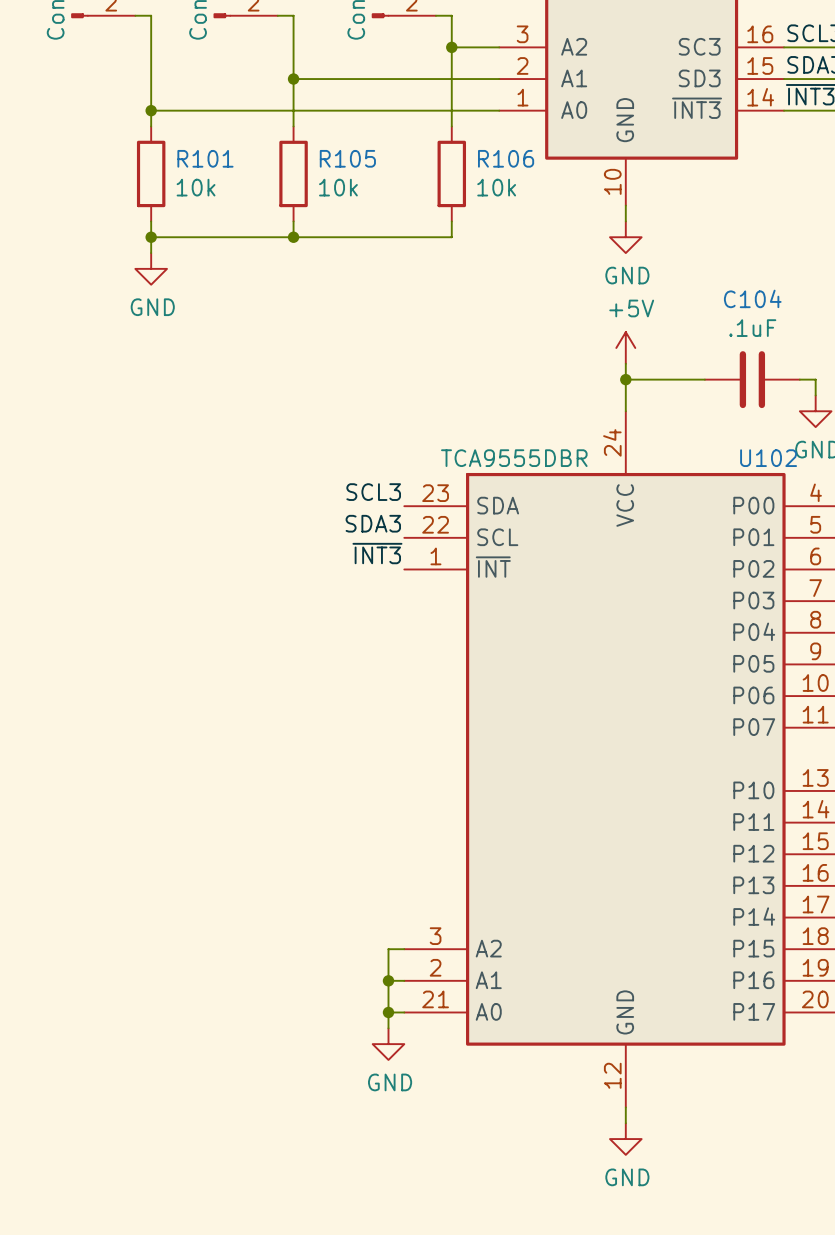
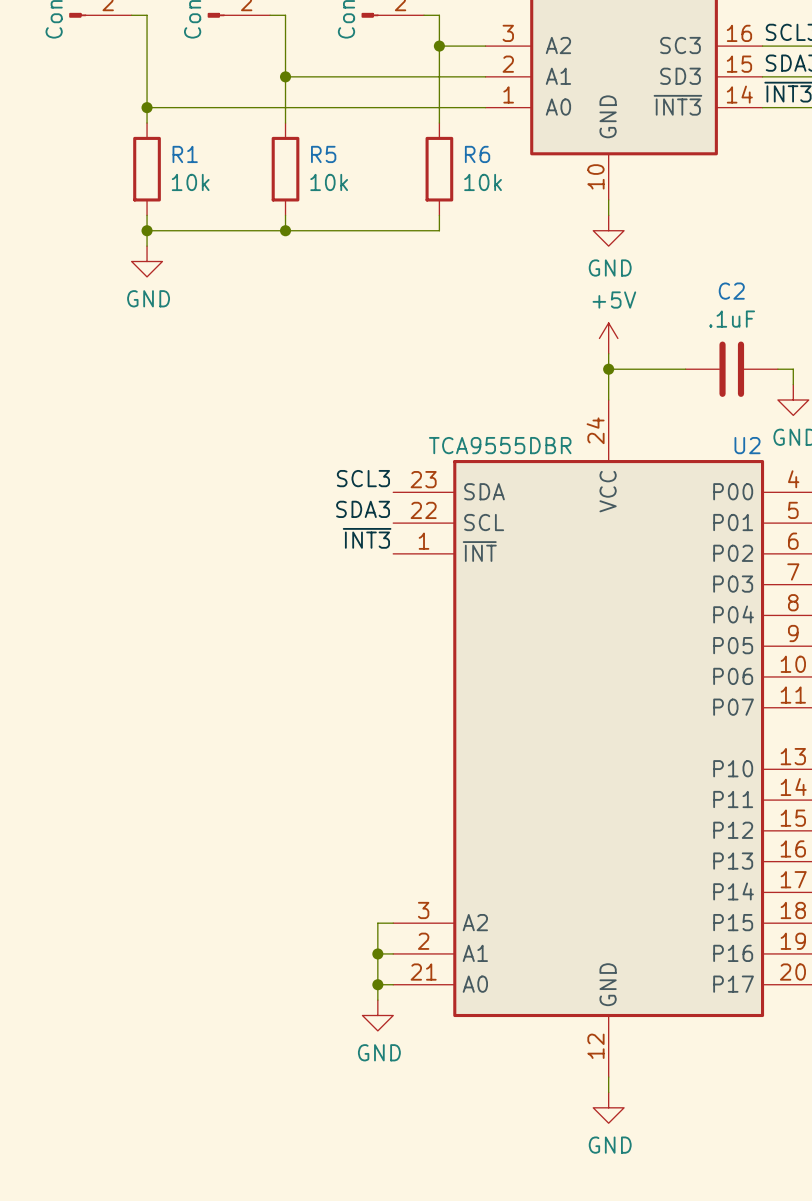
R101 name: R101 (205, 158) -> R1 (185, 154)
R105 name: R105 (347, 158) -> R5 (323, 154)
R106 name: R106 (506, 158) -> R6 (477, 154)
C104 name: C104 (752, 298) -> C2 (731, 291)
U102 name: U102 (768, 458) -> U2 (747, 445)

